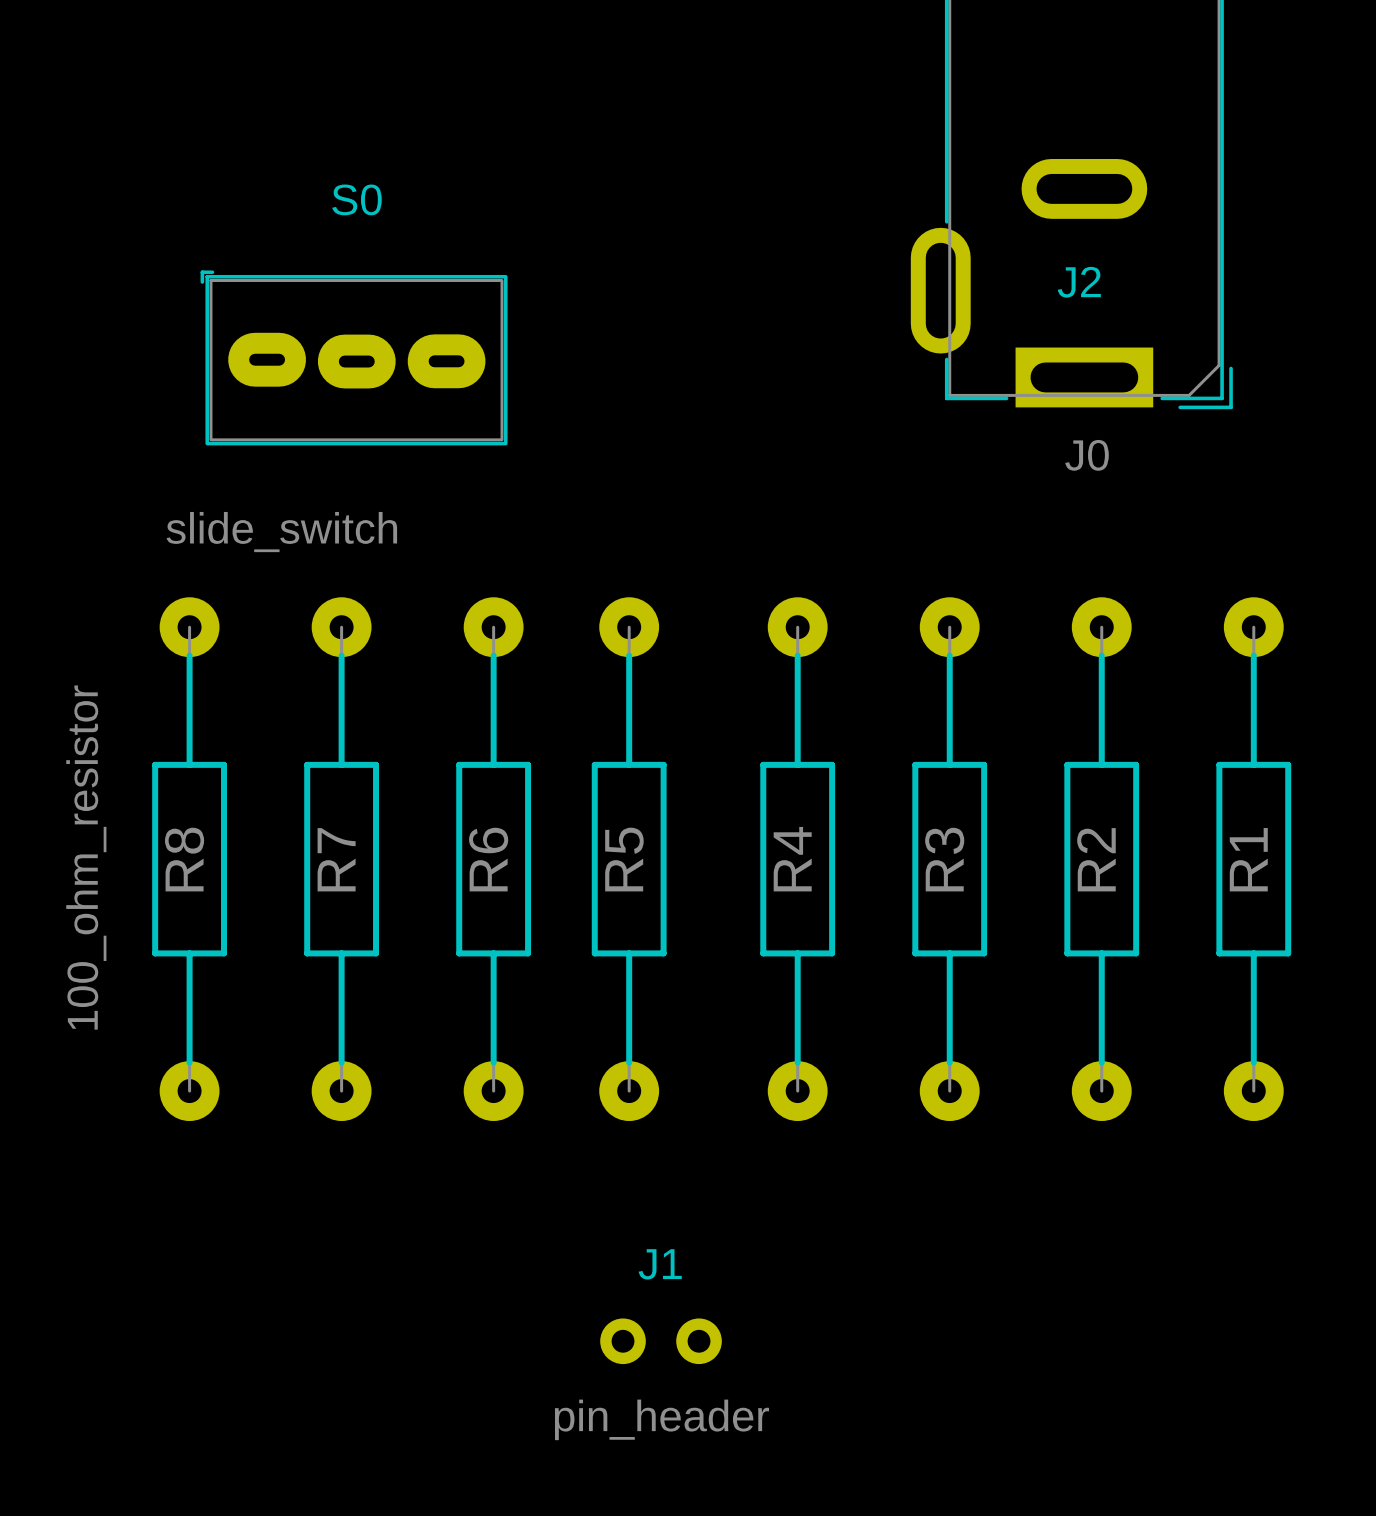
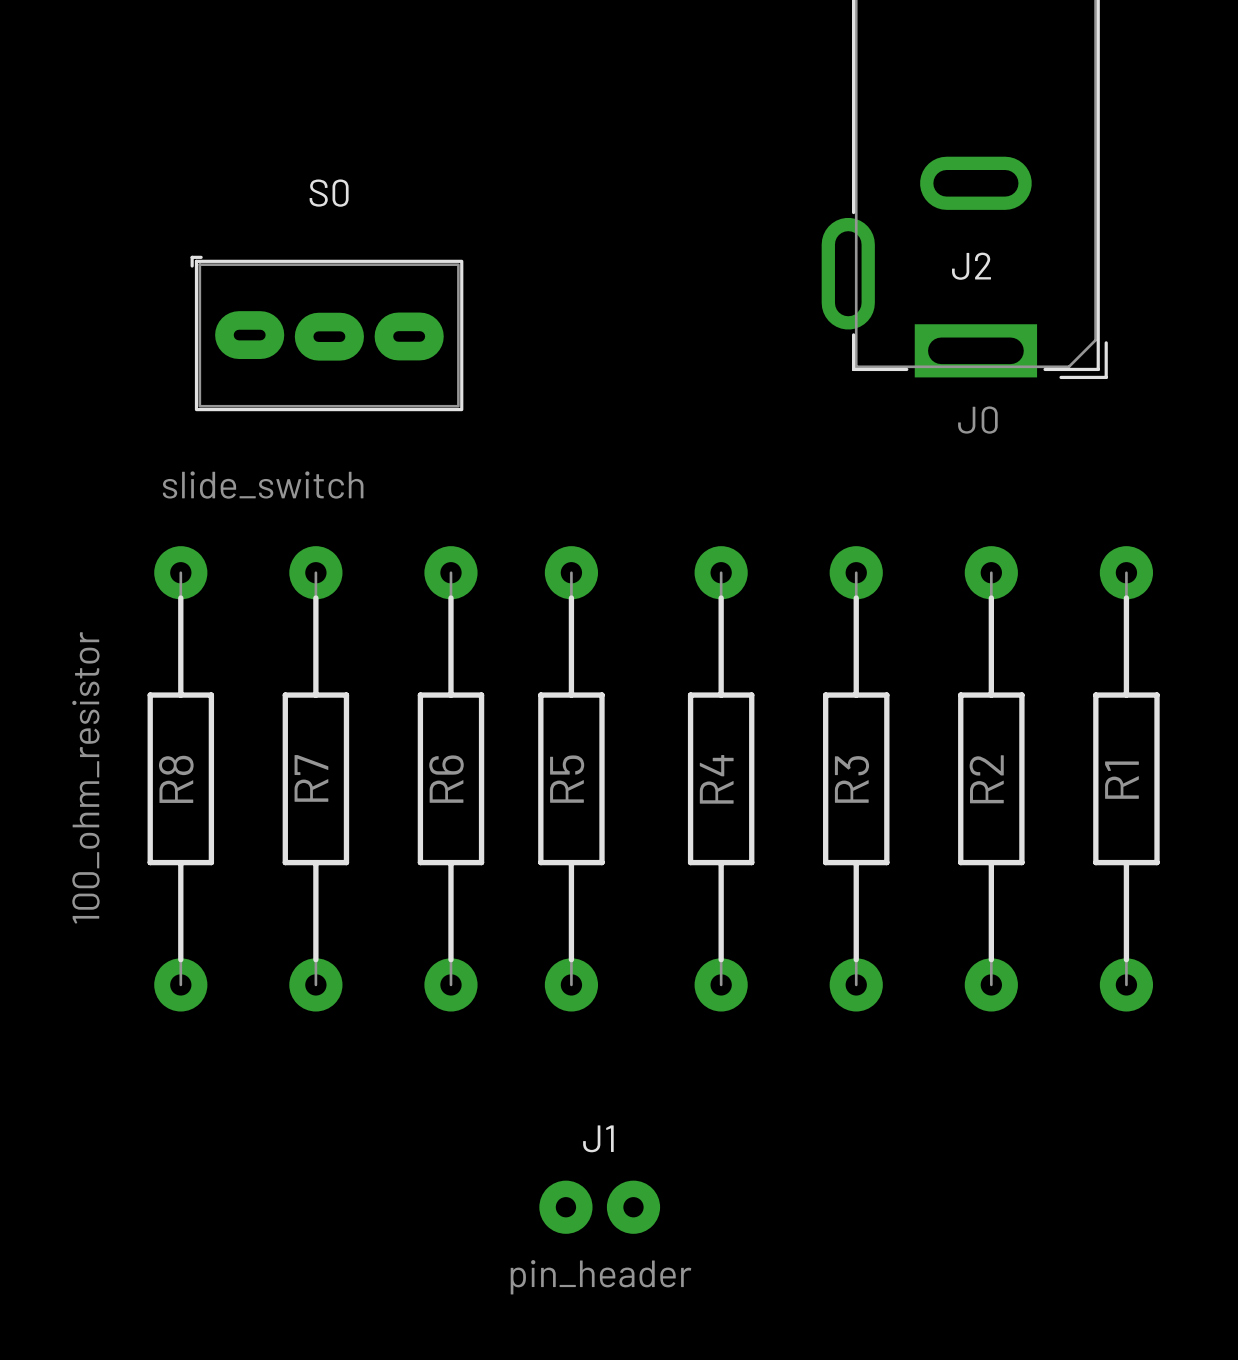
J1 footprint: [600, 1318, 722, 1365] -> [539, 1180, 661, 1234]

